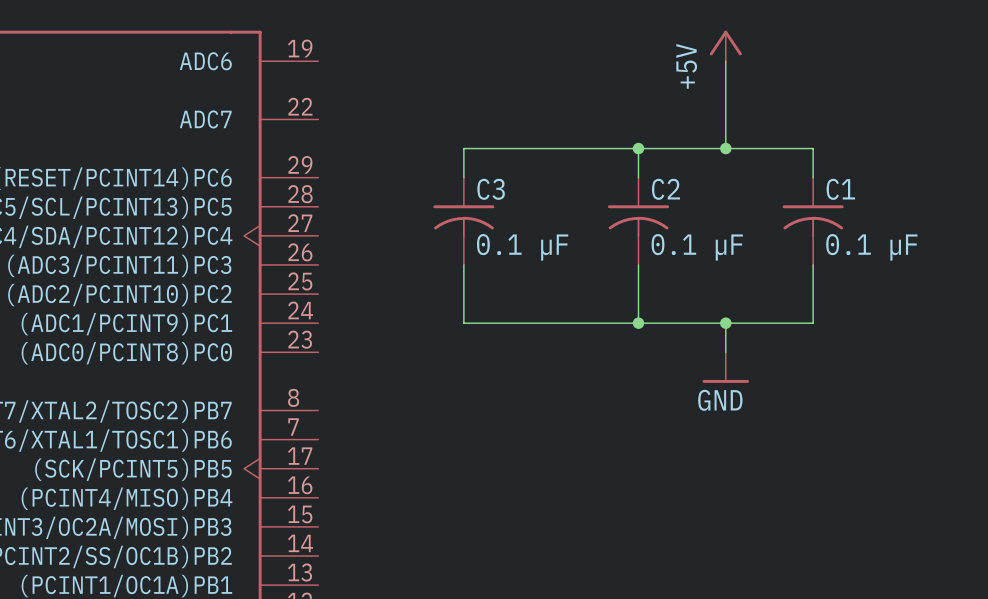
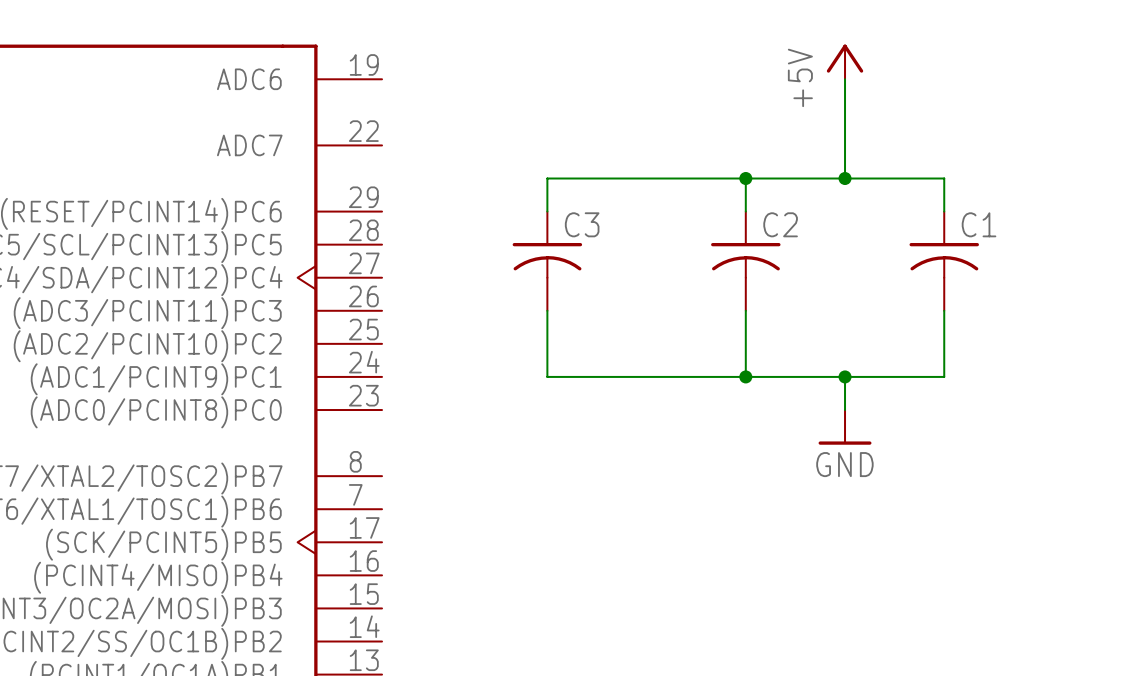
C3 value: 0.1 µF (522, 247) -> none
C2 value: 0.1 µF (697, 247) -> none
C1 value: 0.1 µF (871, 247) -> none

